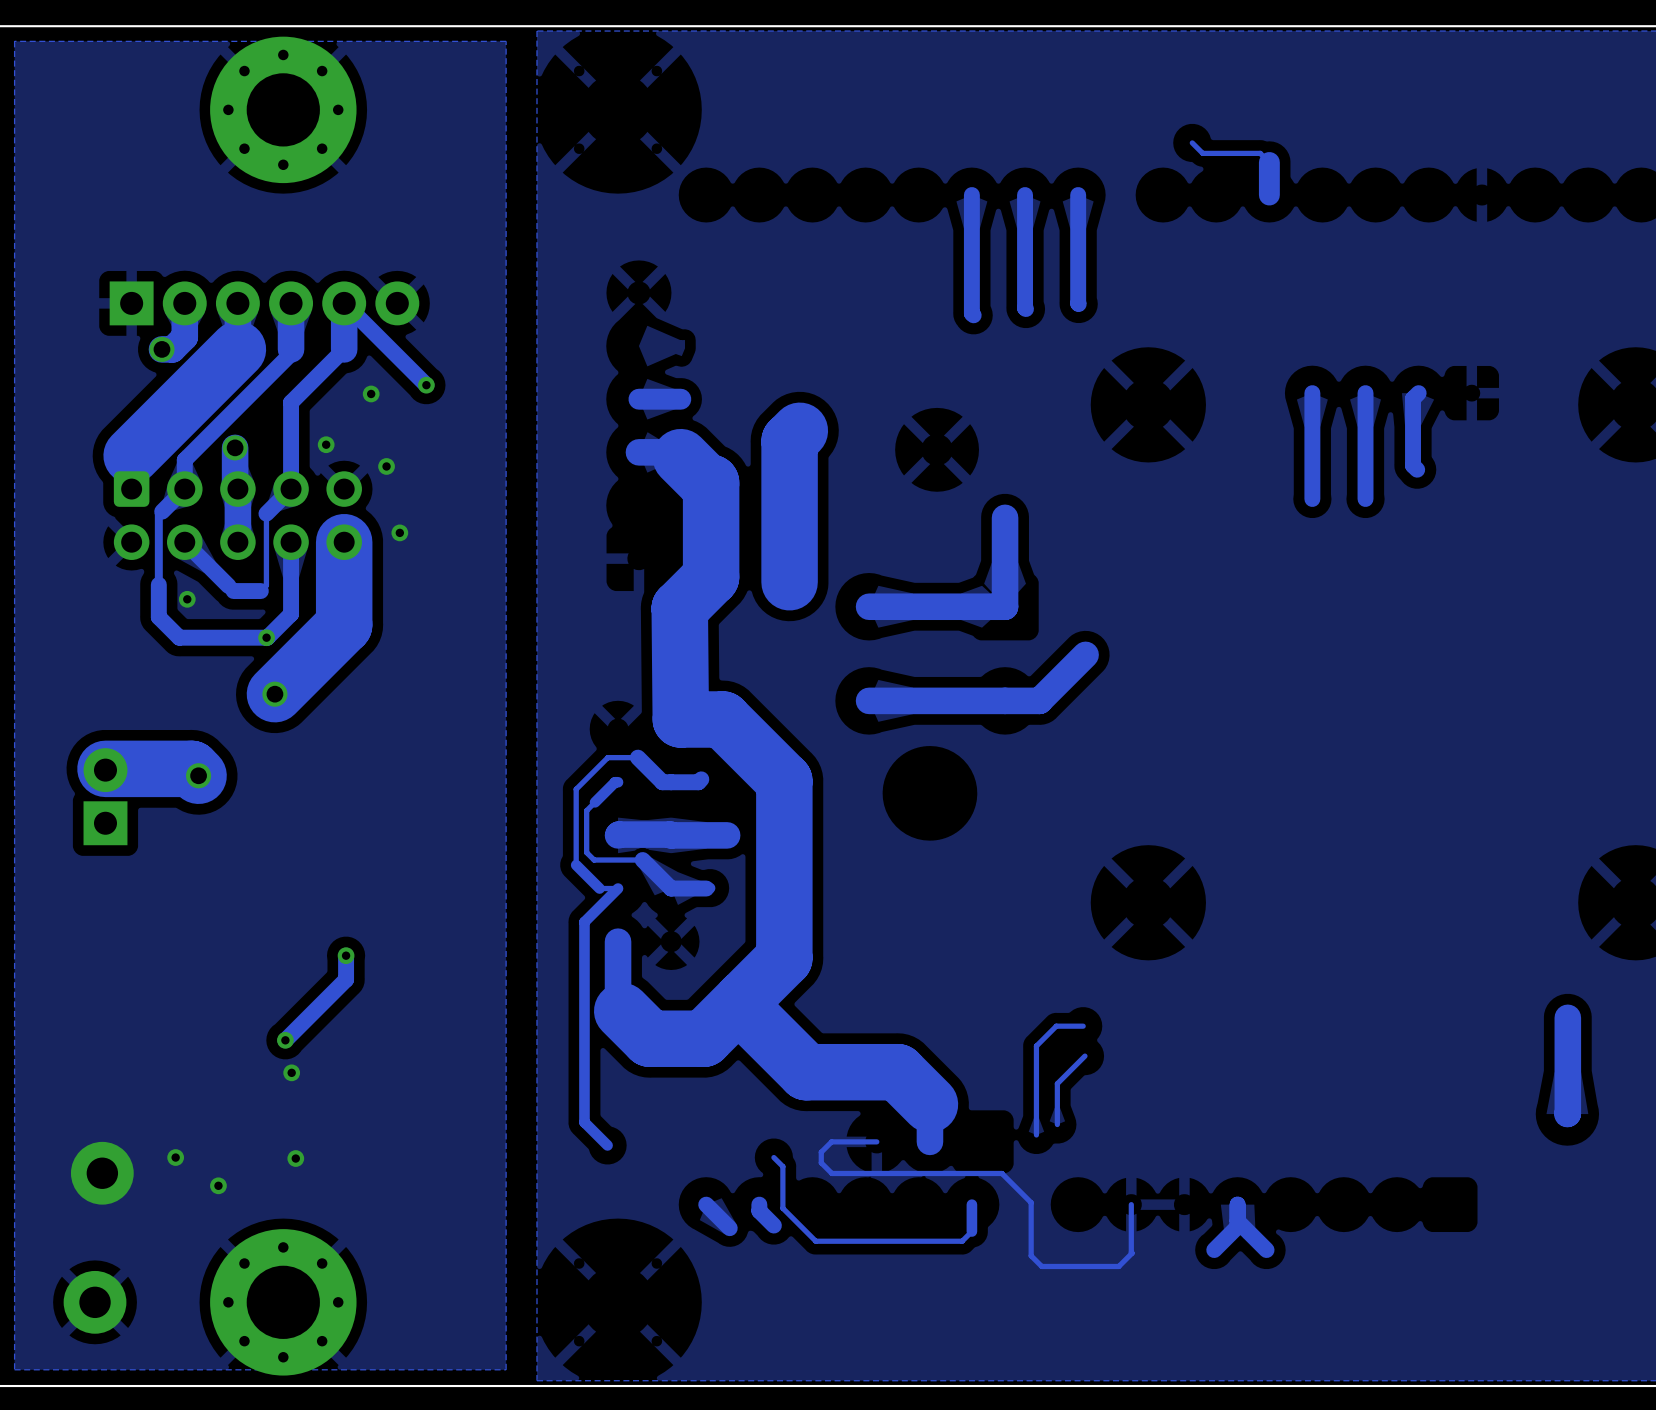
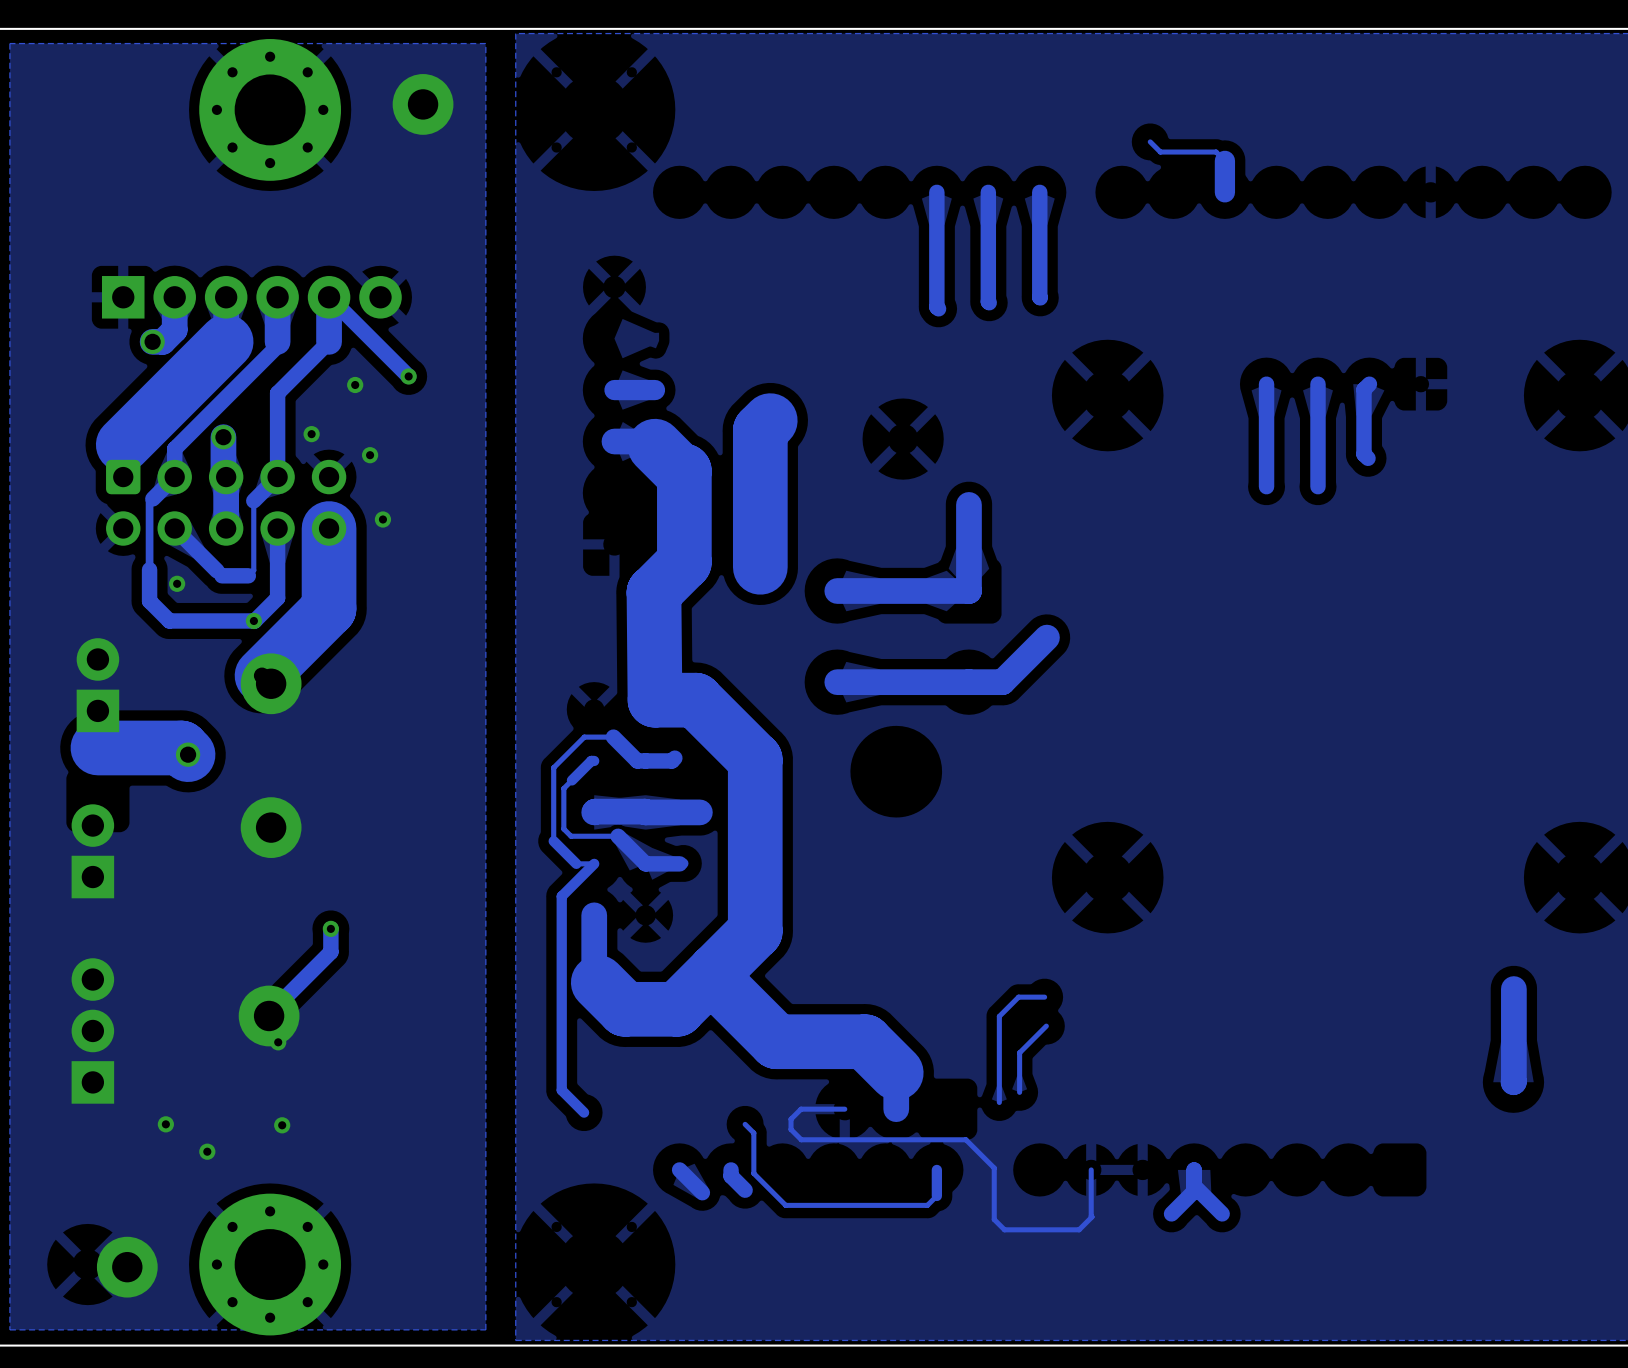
part: none -> (423, 104)
part: none -> (271, 683)
part: none -> (97, 685)
part: (105, 796) -> none
part: none -> (271, 827)
part: none -> (92, 851)
part: none -> (269, 1015)
part: none -> (92, 1030)
part: (102, 1173) -> none
part position: (95, 1302) -> (127, 1267)

